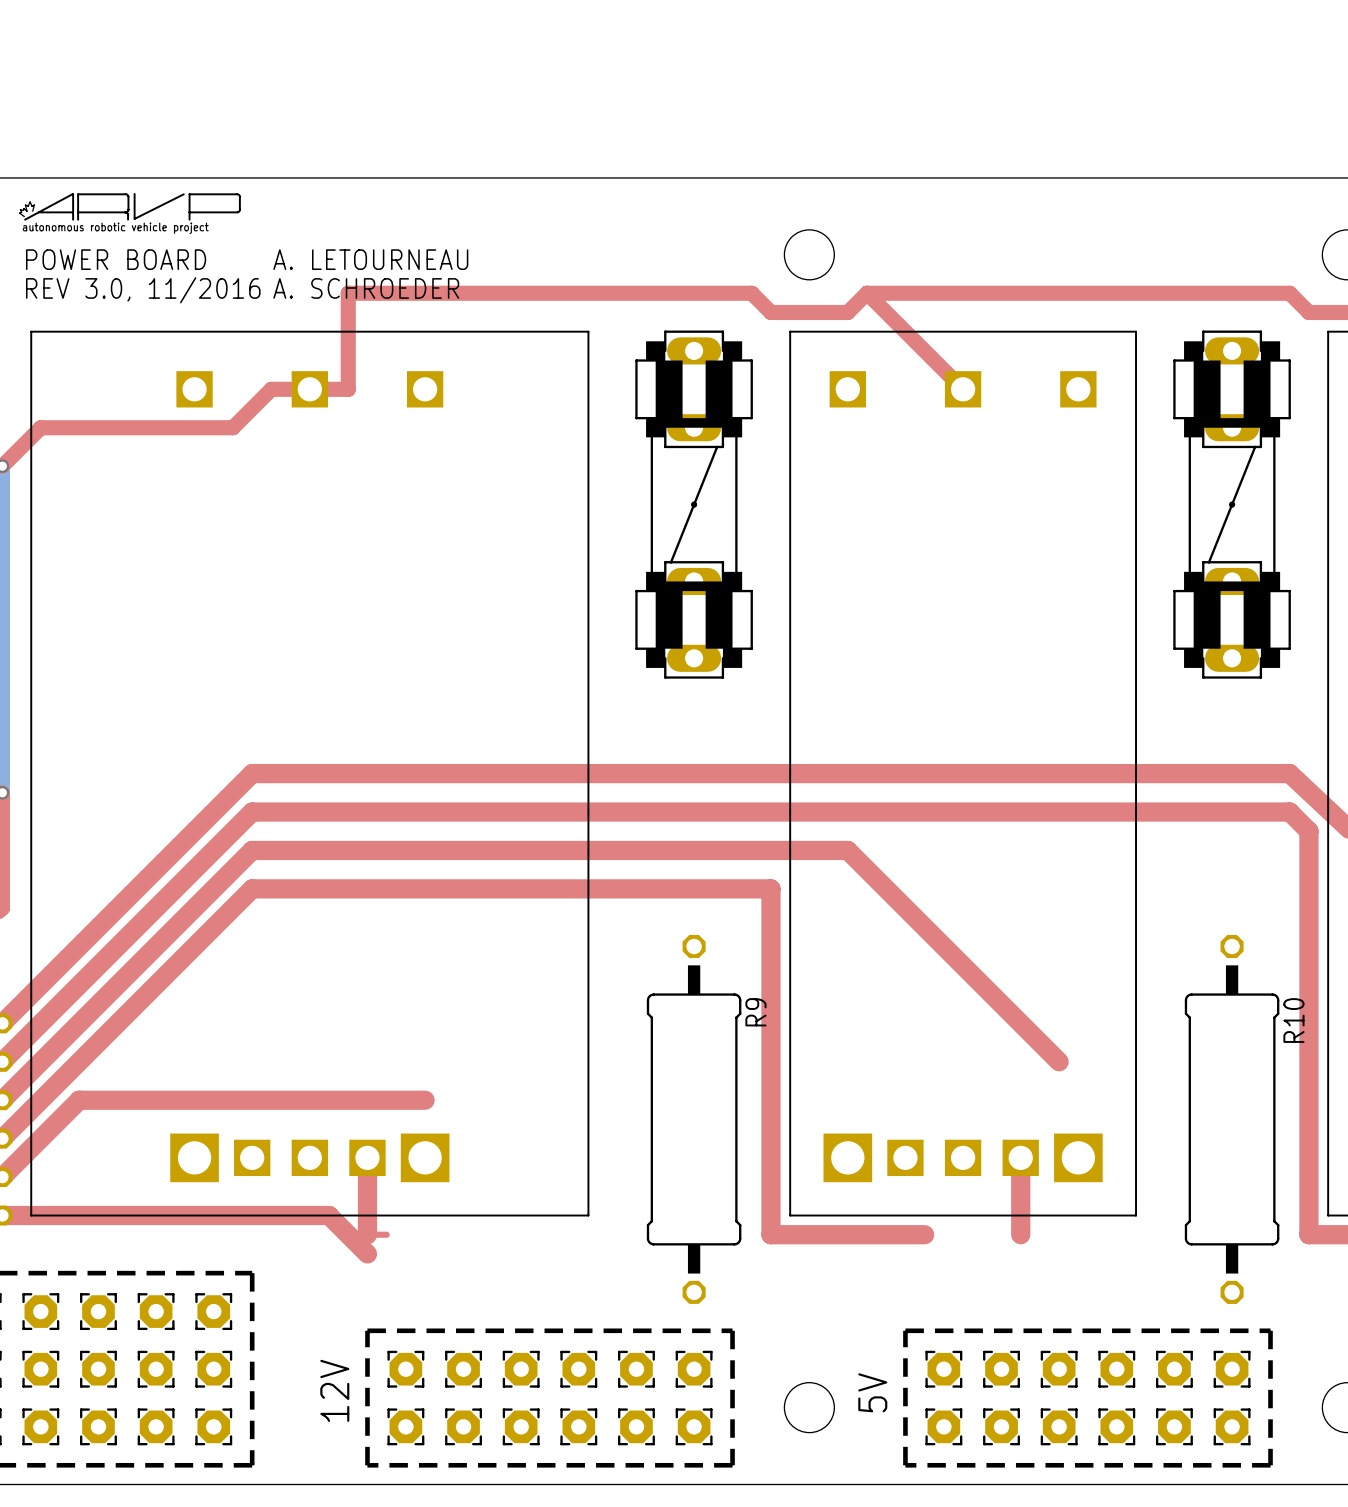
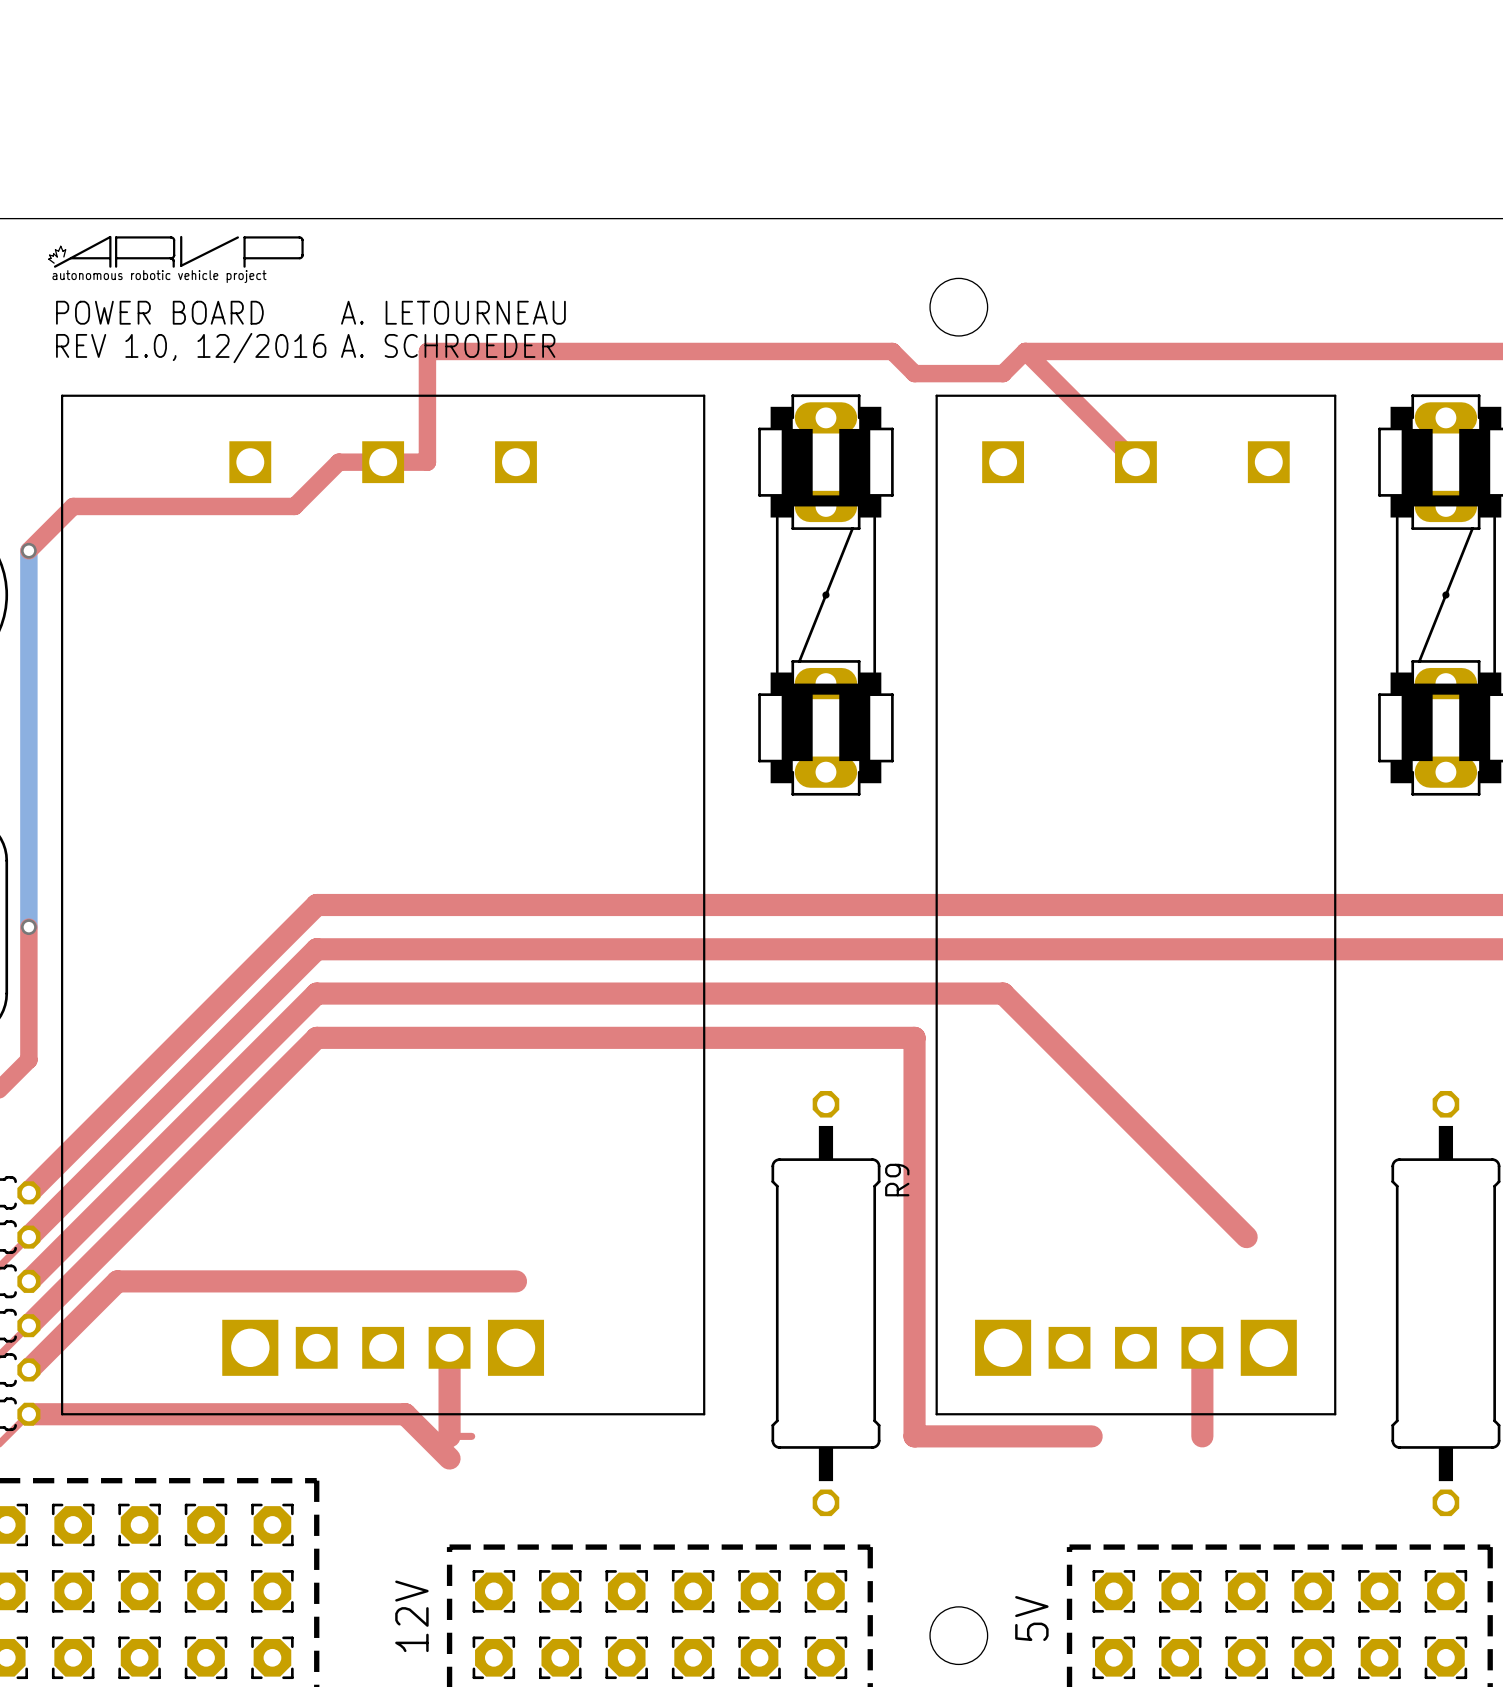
text: REV 3.0, 11/2016 (143, 290) -> REV 1.0, 12/2016 (191, 348)

